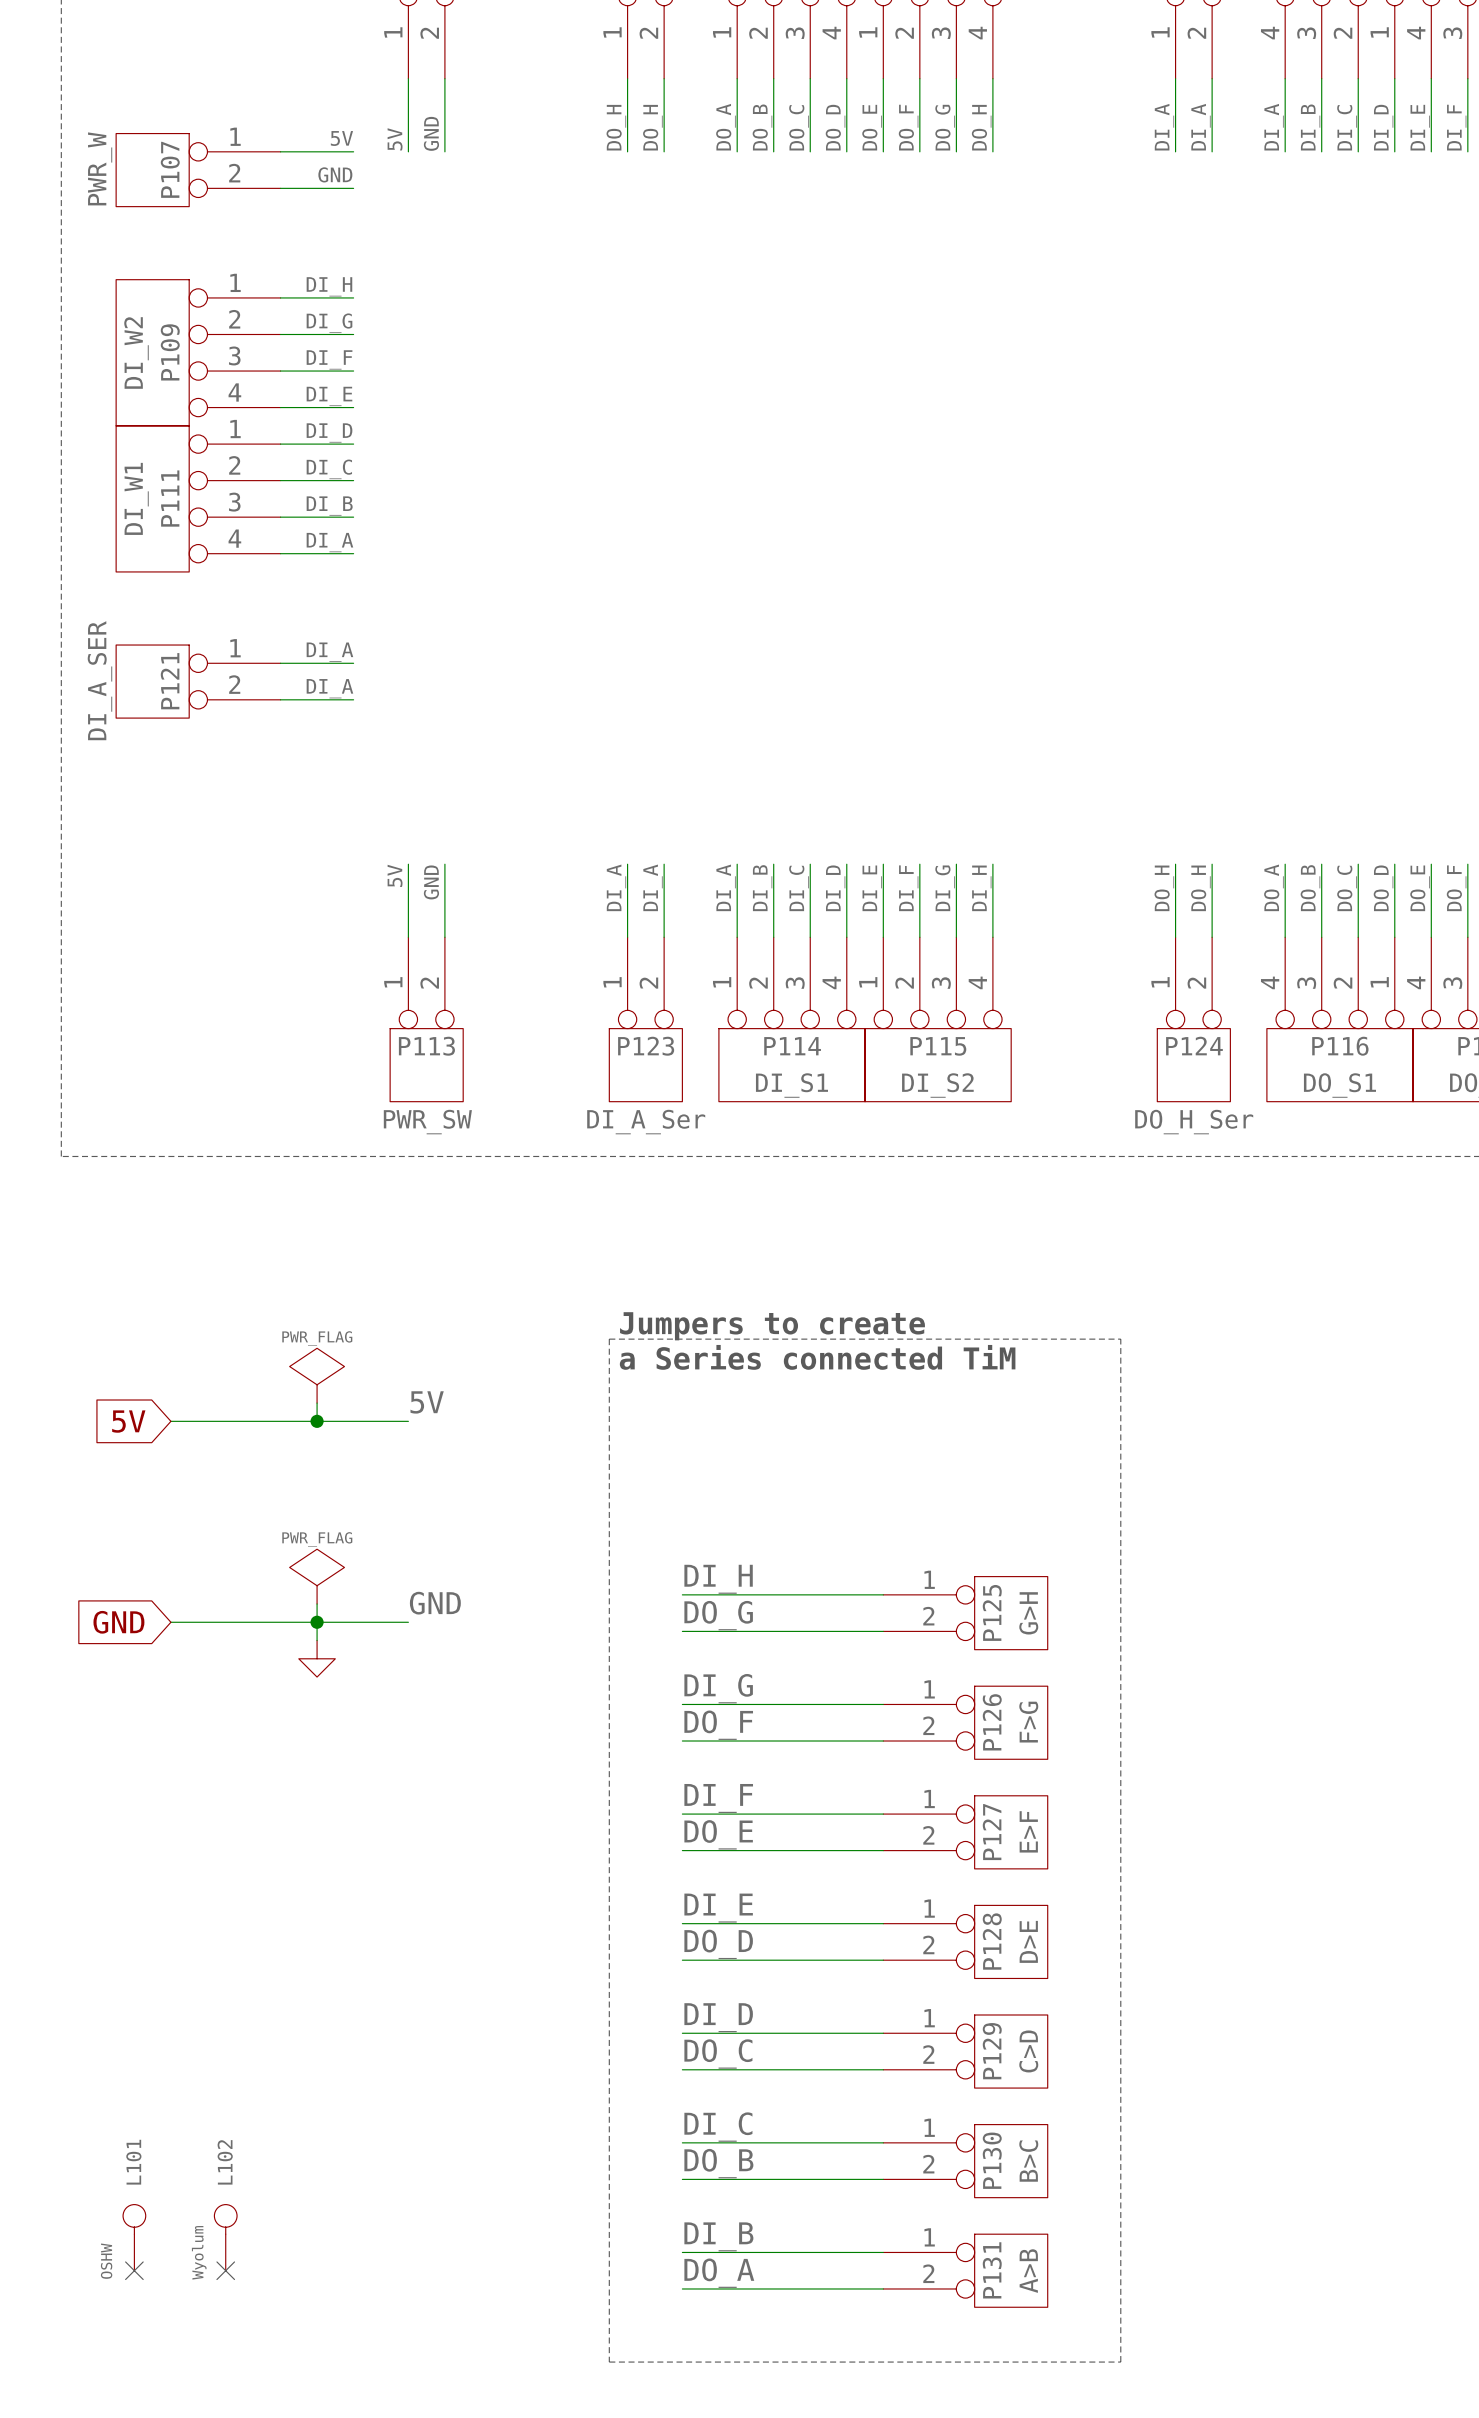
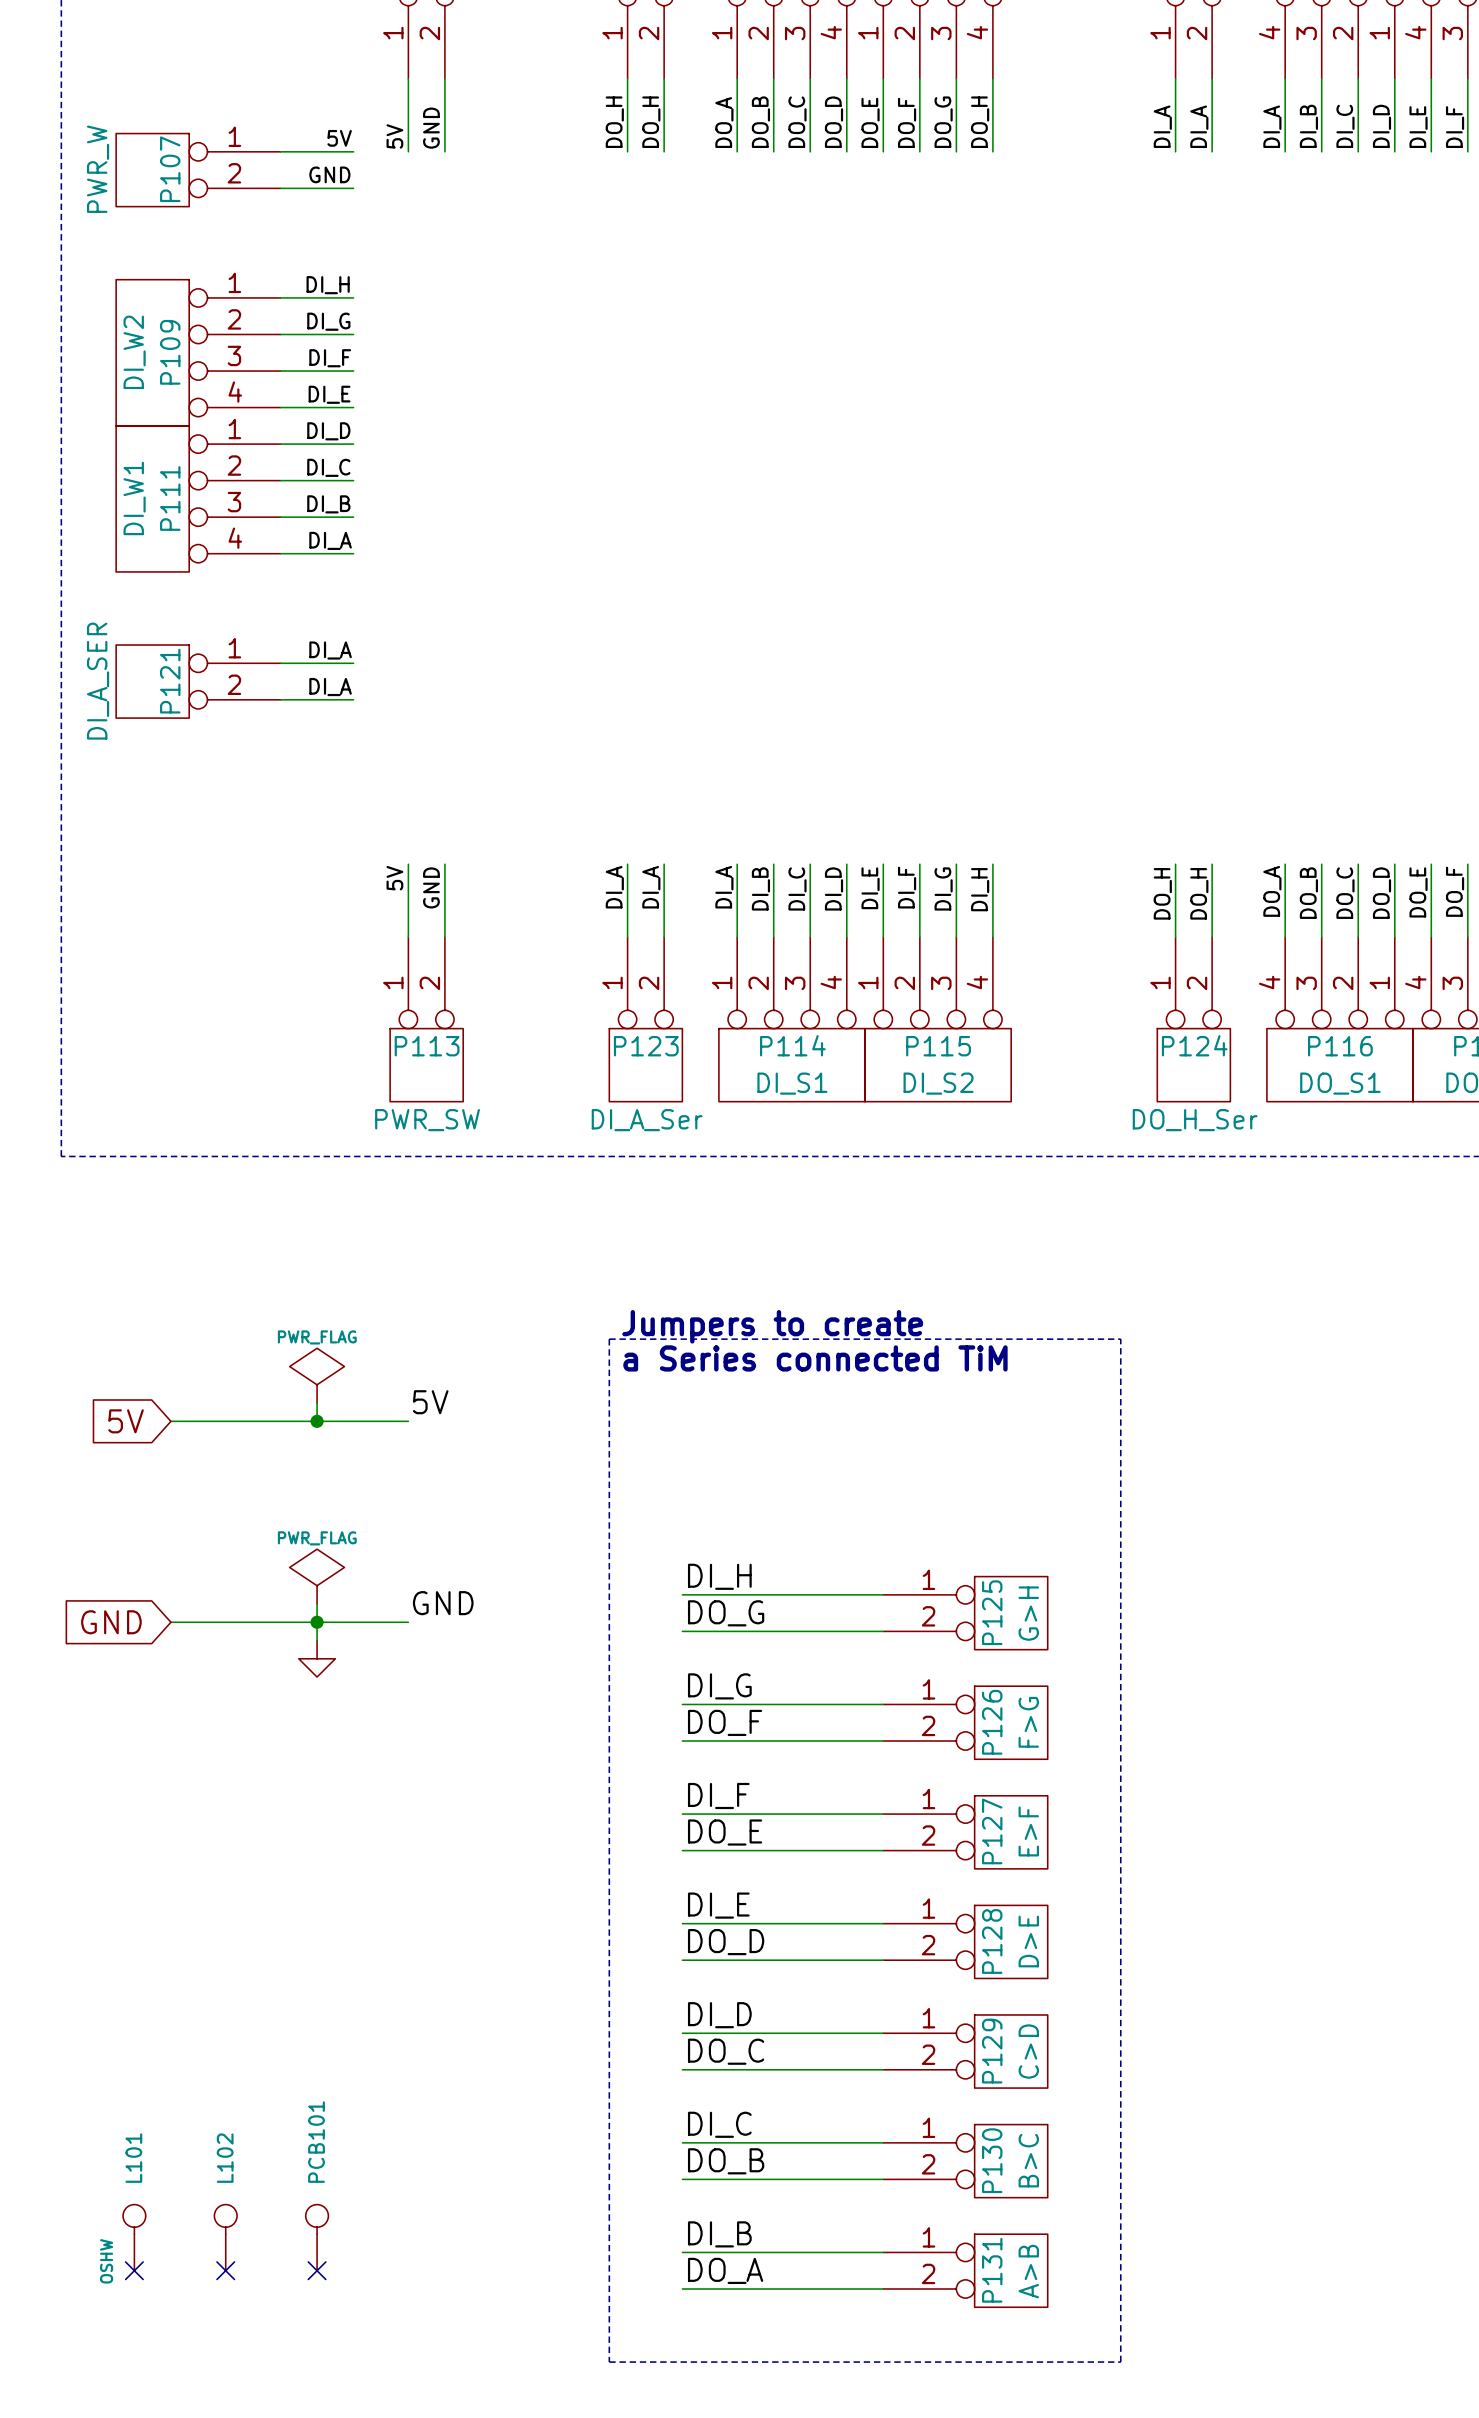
PCB101: none -> (317, 2237)
L102 value: Wyolum (199, 2252) -> none
no-connect mark: none -> (317, 2270)

